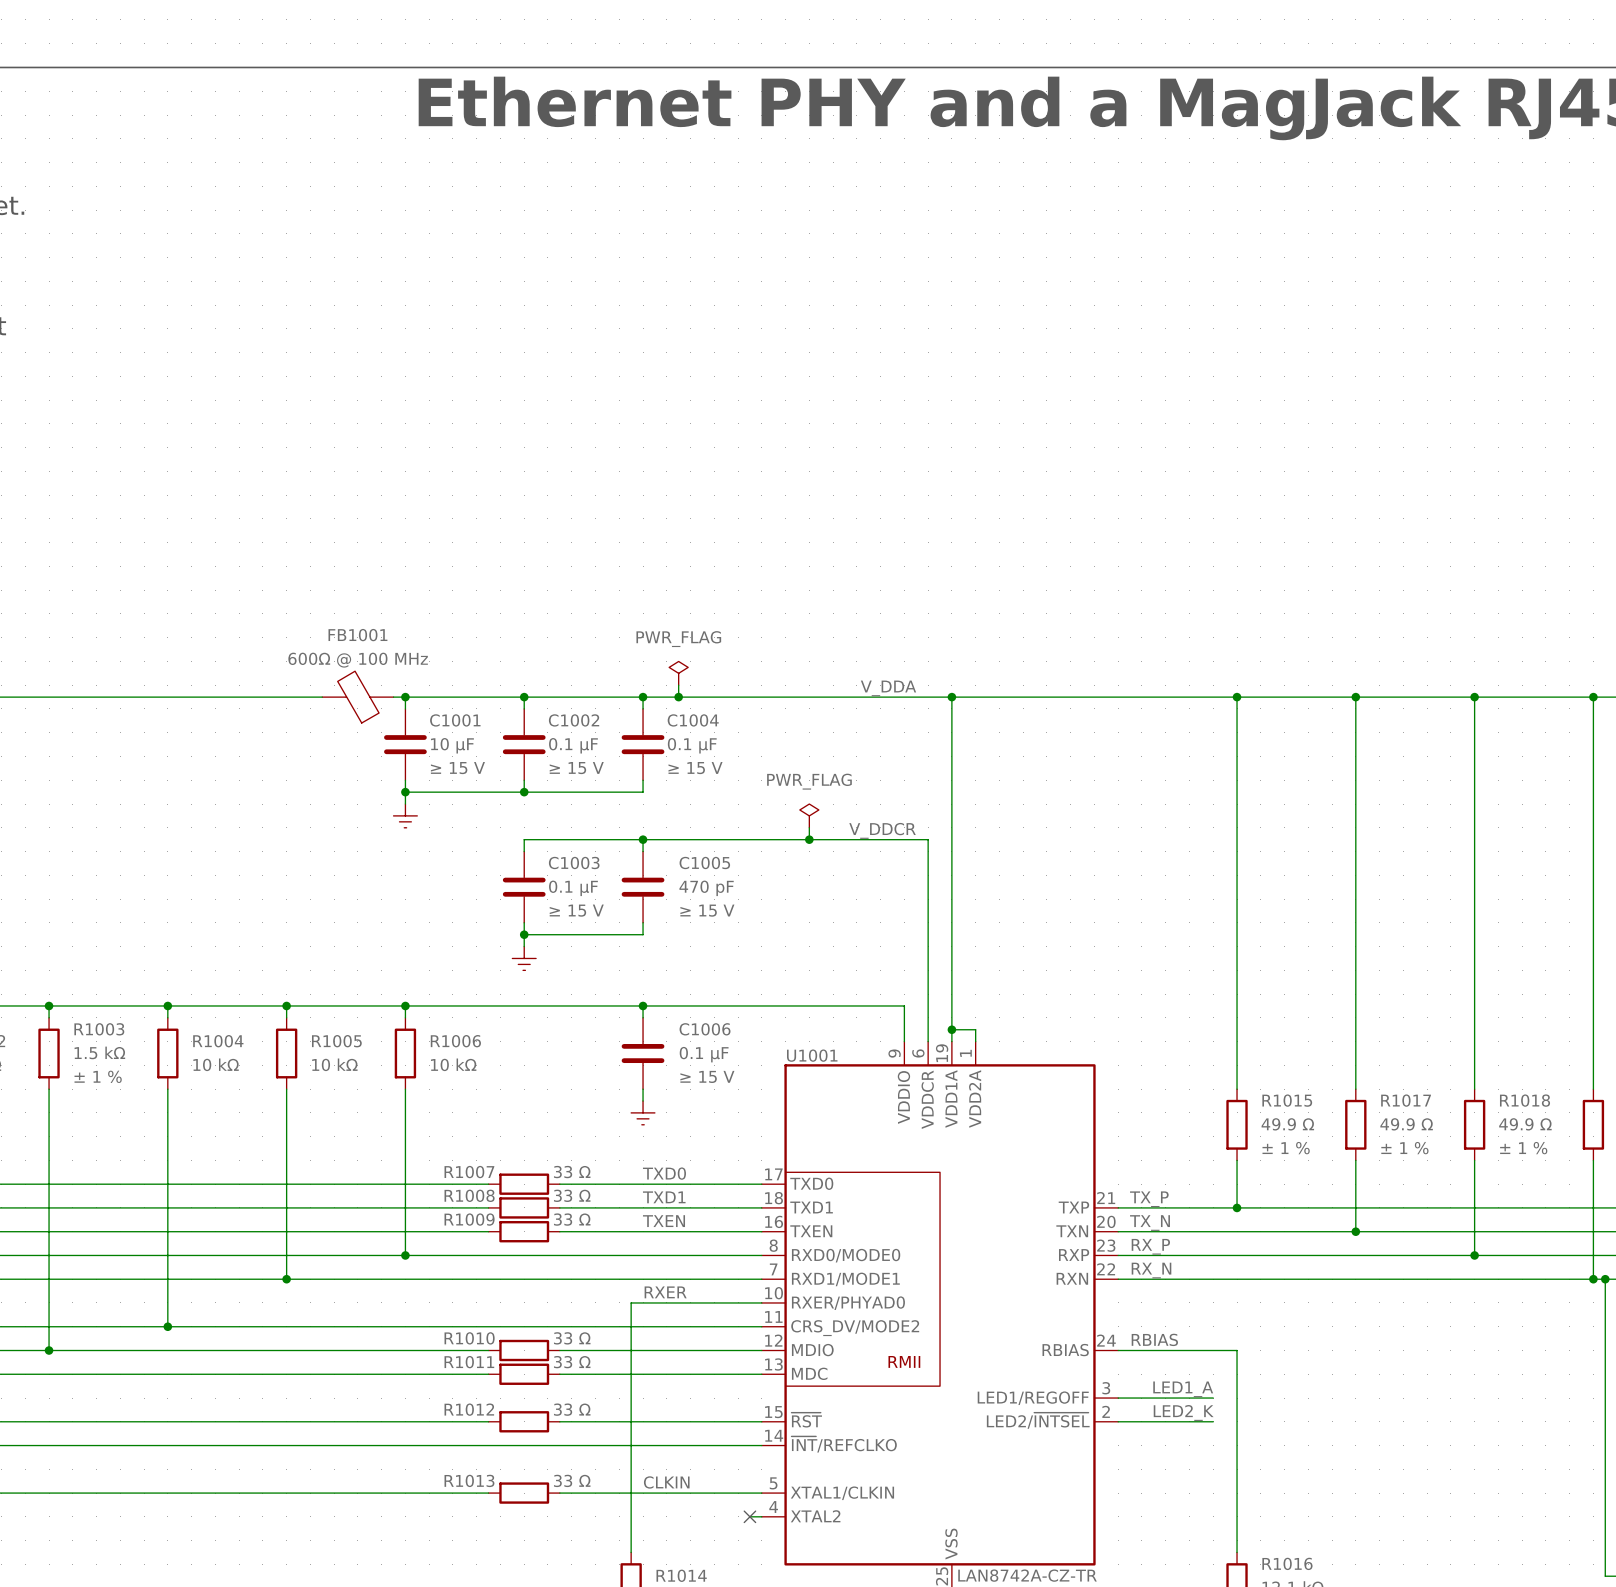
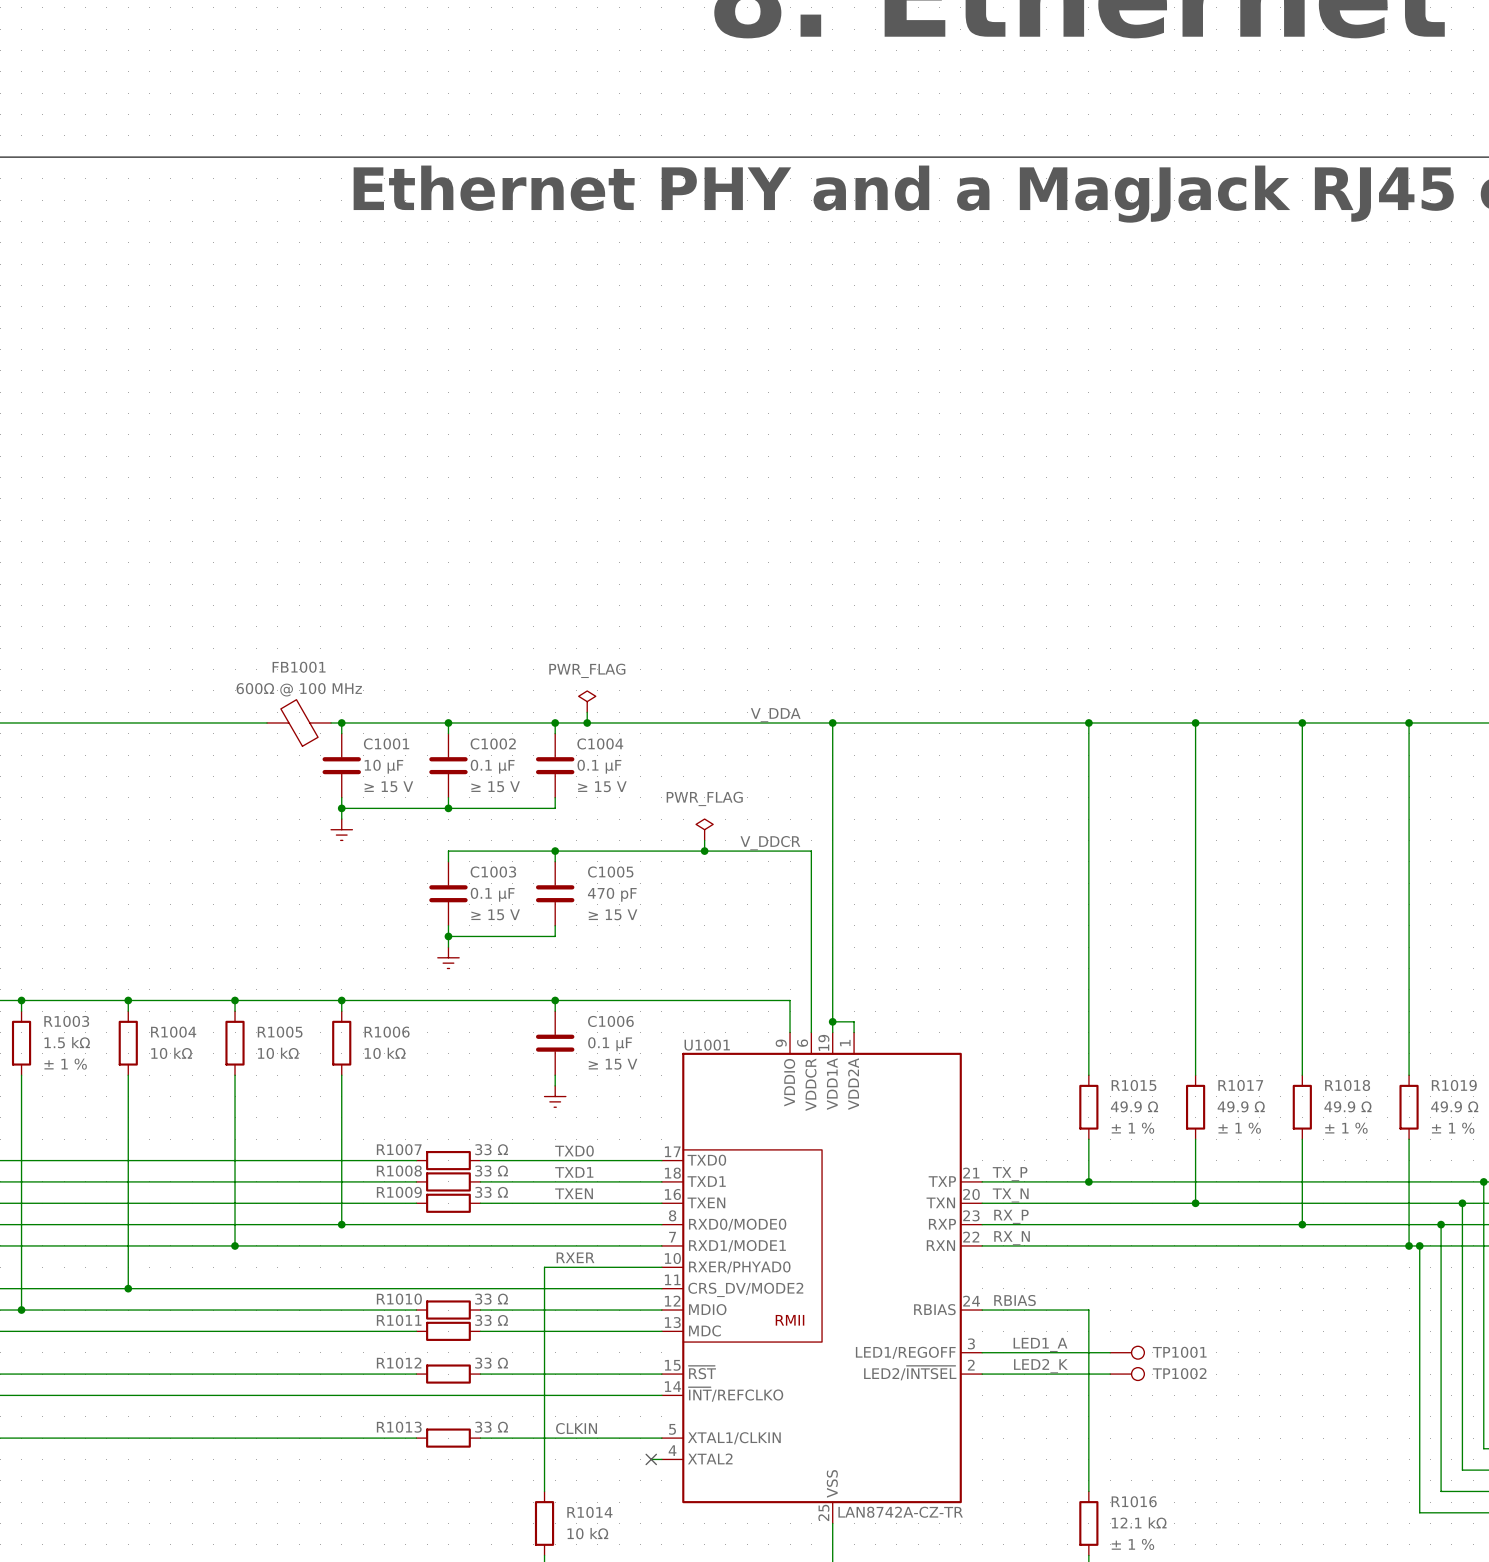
wire: none -> (1067, 1352) (1110, 1352)
TP1001: none -> (1127, 1352)
wire: none -> (1067, 1374) (1110, 1374)
TP1002: none -> (1127, 1374)

